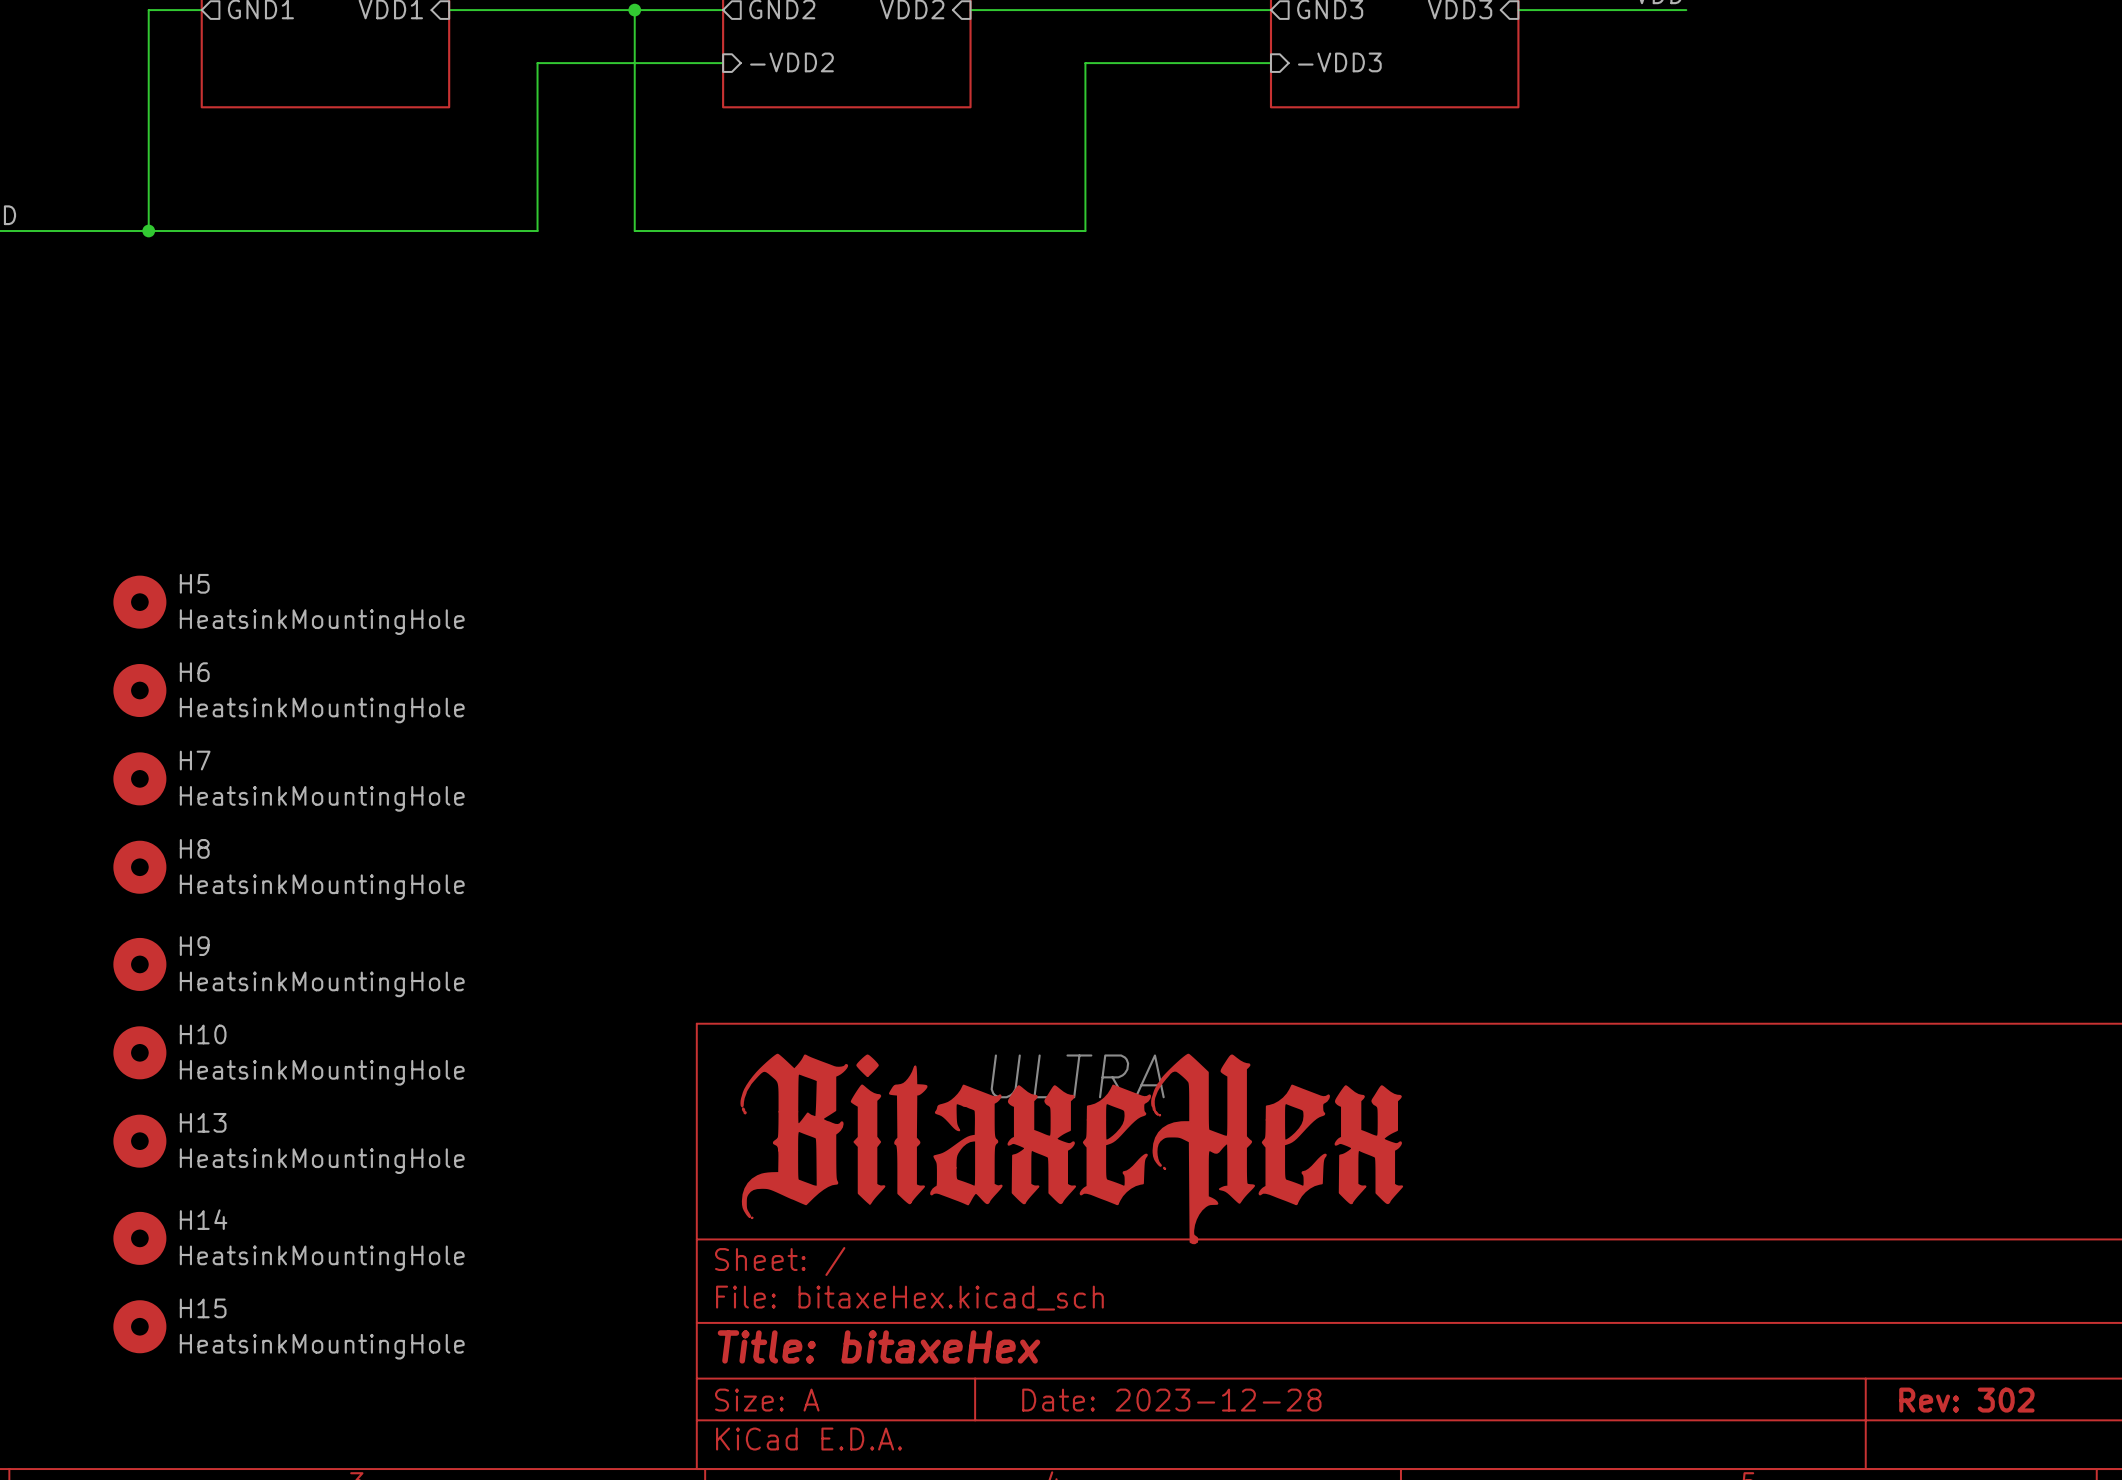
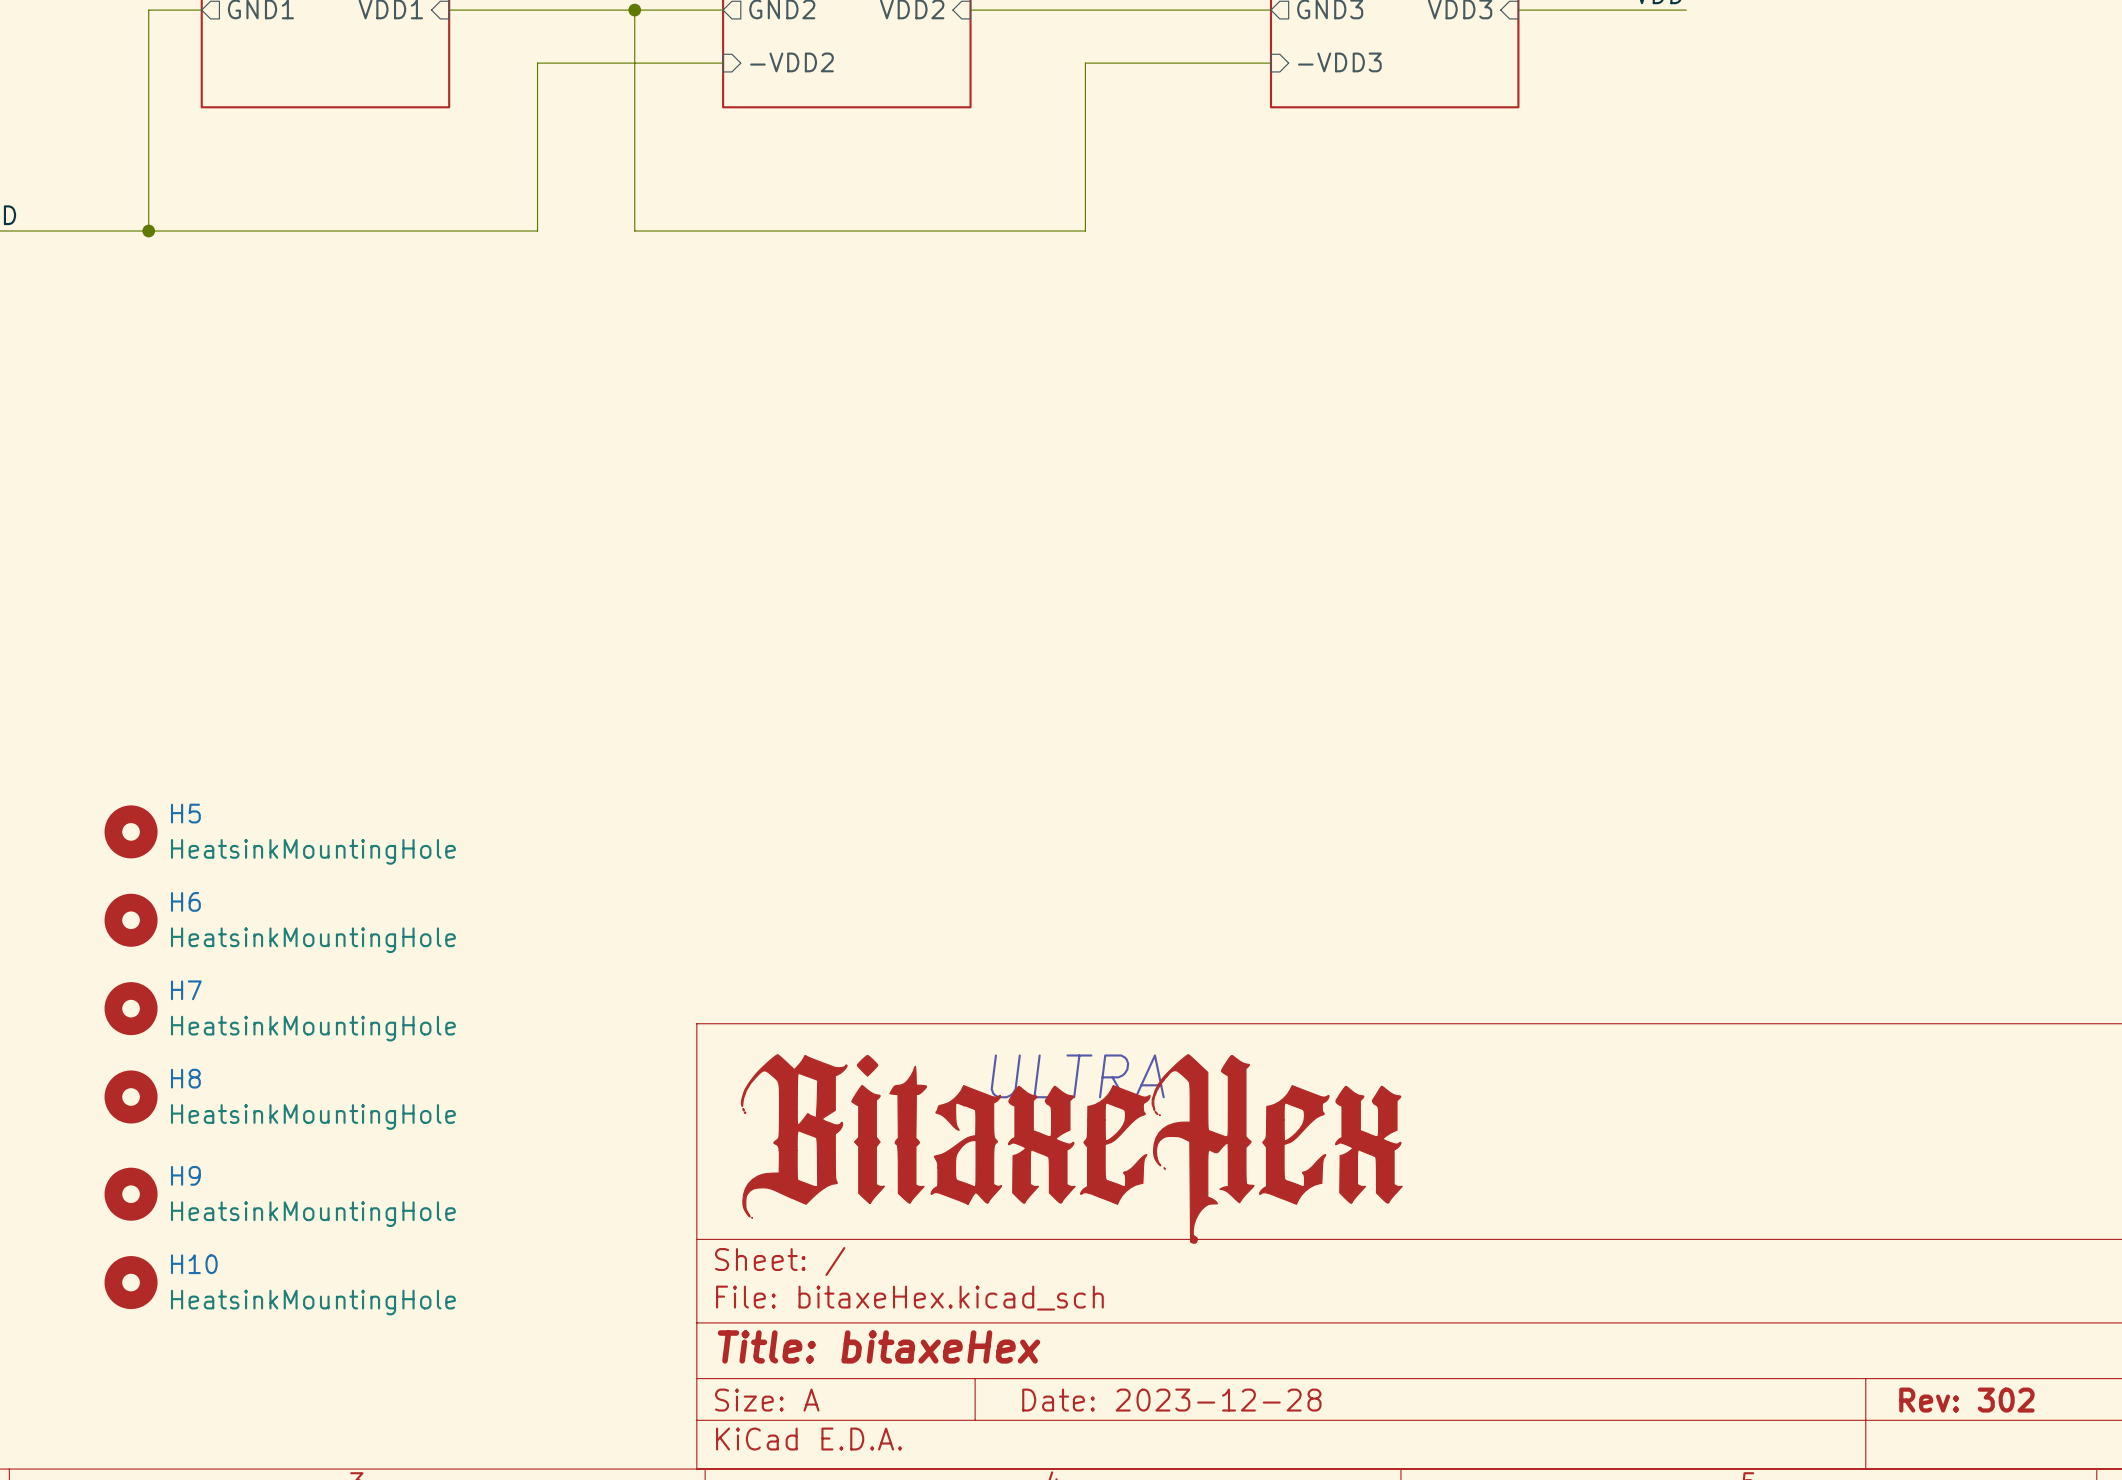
H5 position: (139, 602) -> (131, 831)
H6 position: (139, 690) -> (131, 920)
H7 position: (139, 778) -> (131, 1008)
H8 position: (139, 867) -> (131, 1096)
H9 position: (139, 964) -> (131, 1194)
H10 position: (139, 1052) -> (131, 1282)
H13: HeatsinkMountingHole (139, 1141) -> none
H14: HeatsinkMountingHole (139, 1238) -> none
H15: HeatsinkMountingHole (139, 1326) -> none

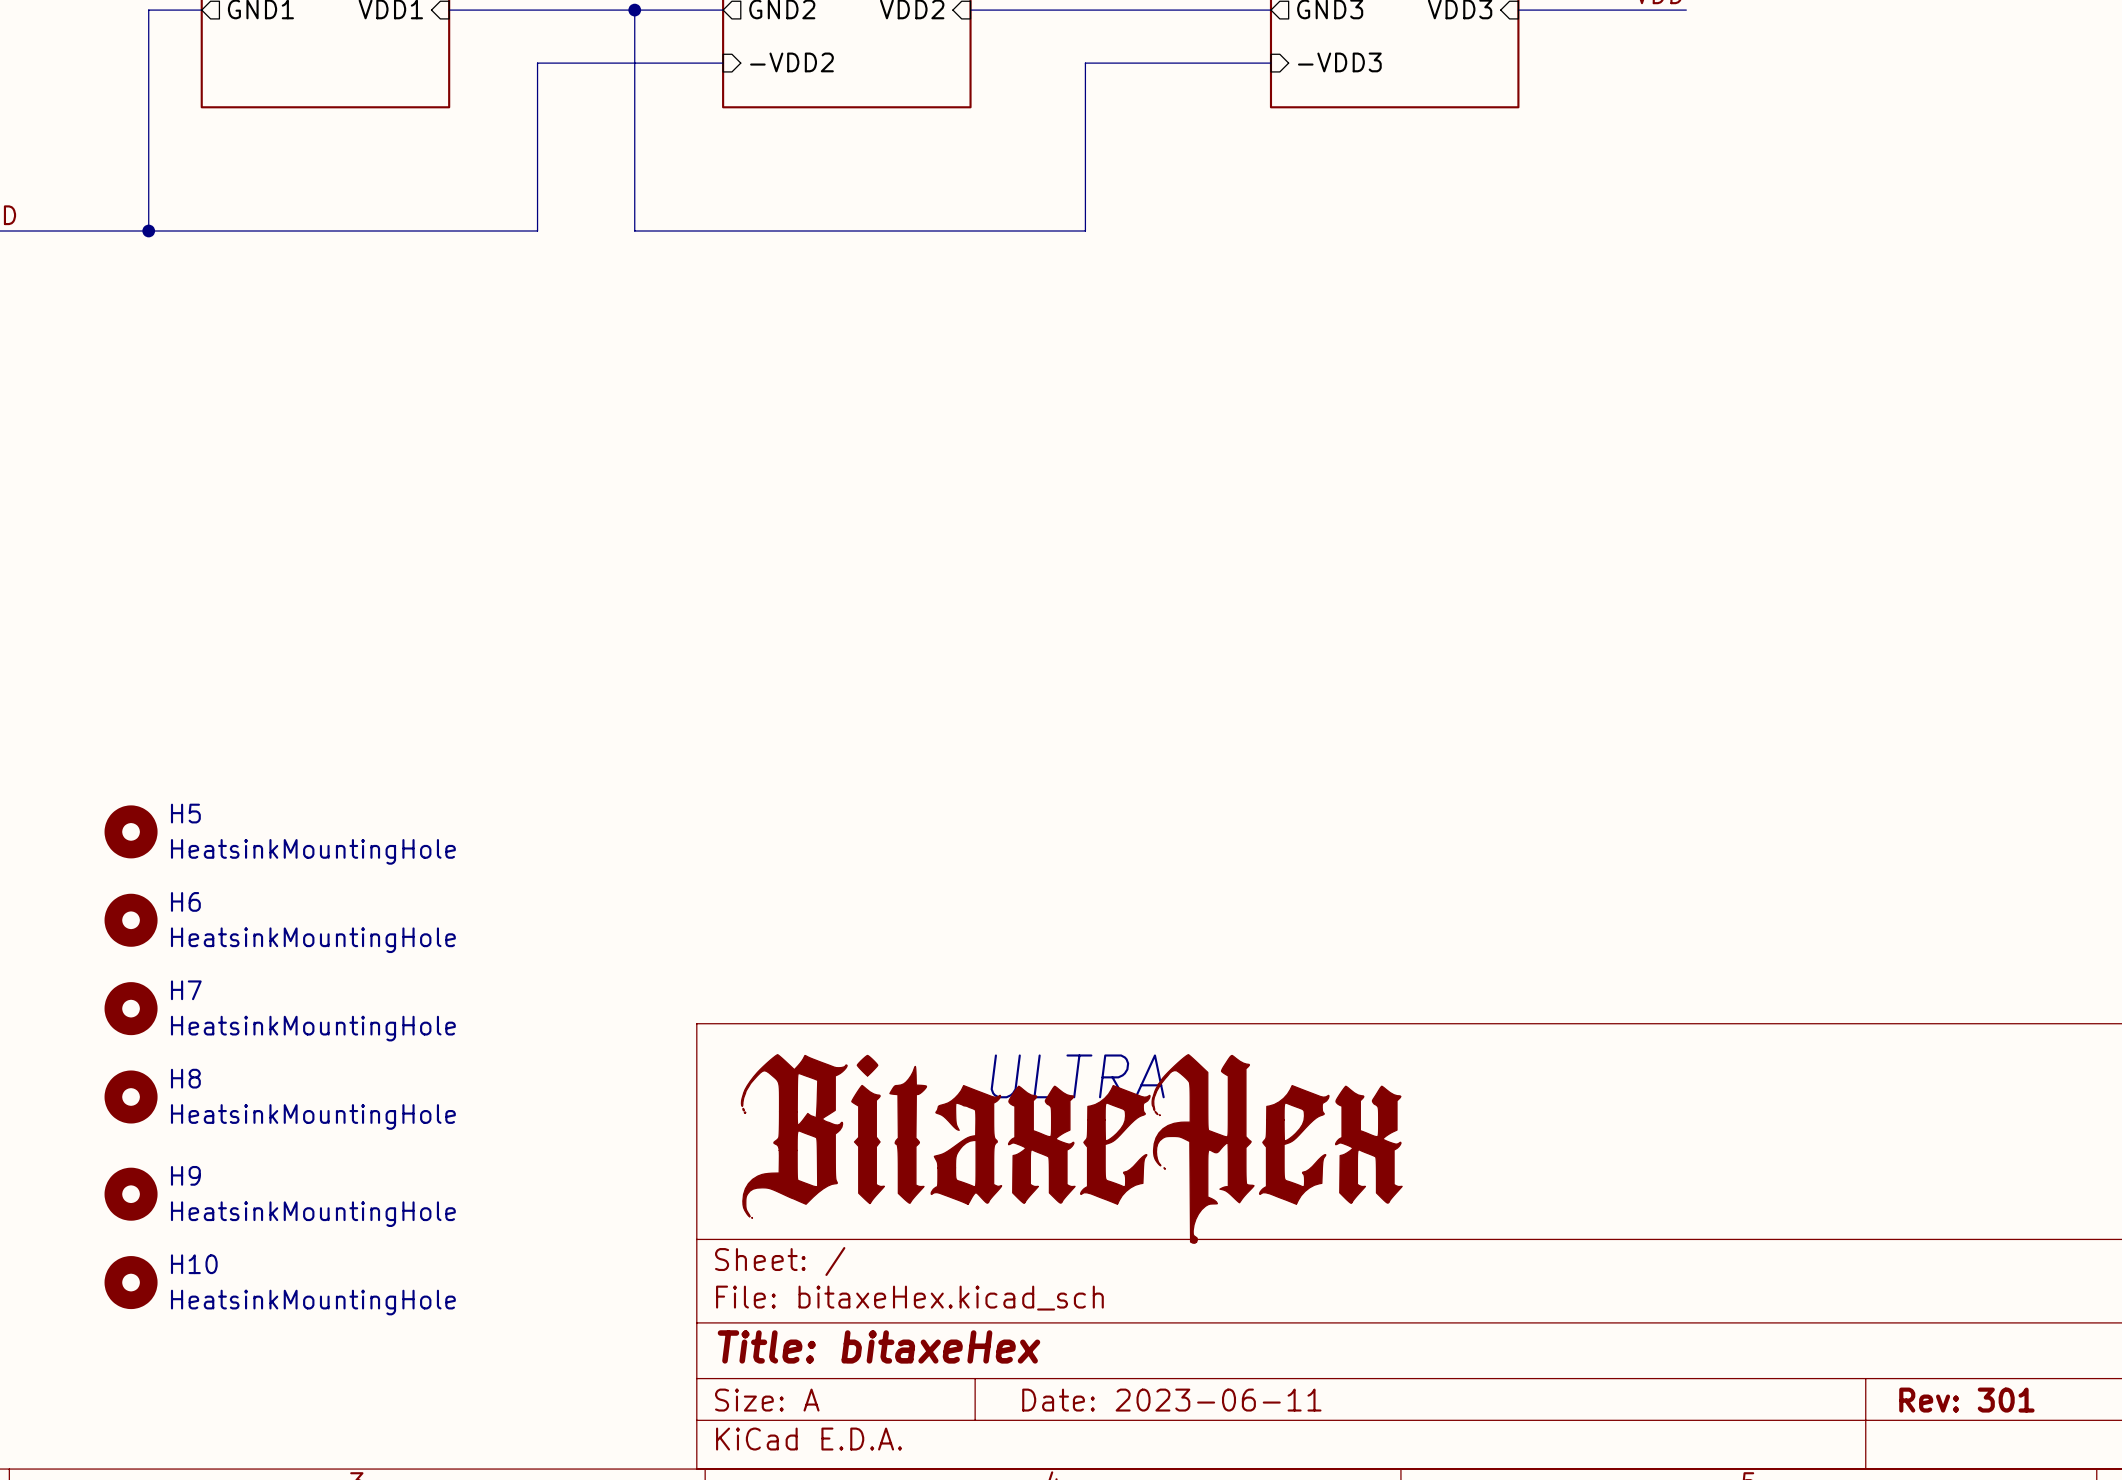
title block: Date: 2023-12-28 (1171, 1400) -> Date: 2023-06-11 (1171, 1400)
title block: Rev: 302 (1966, 1400) -> Rev: 301 (1966, 1400)

